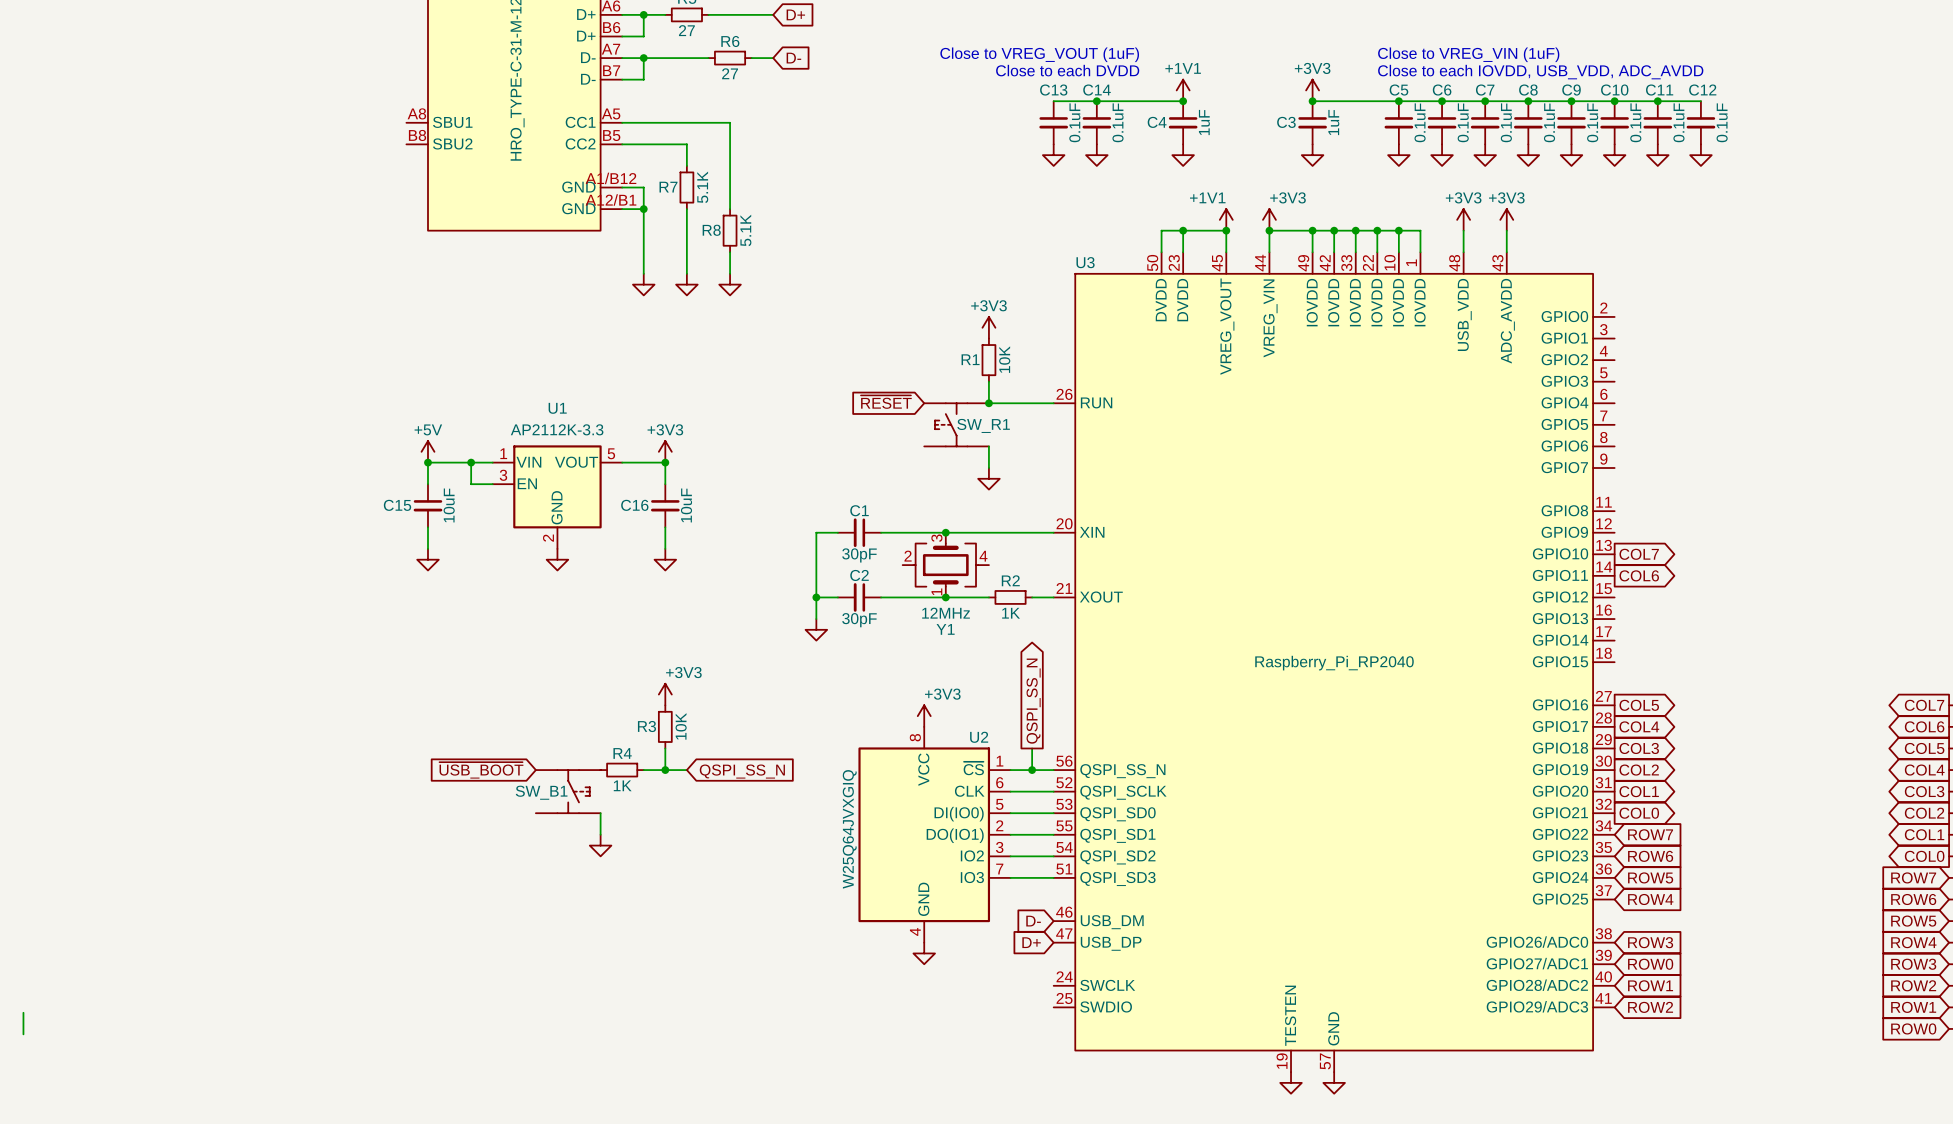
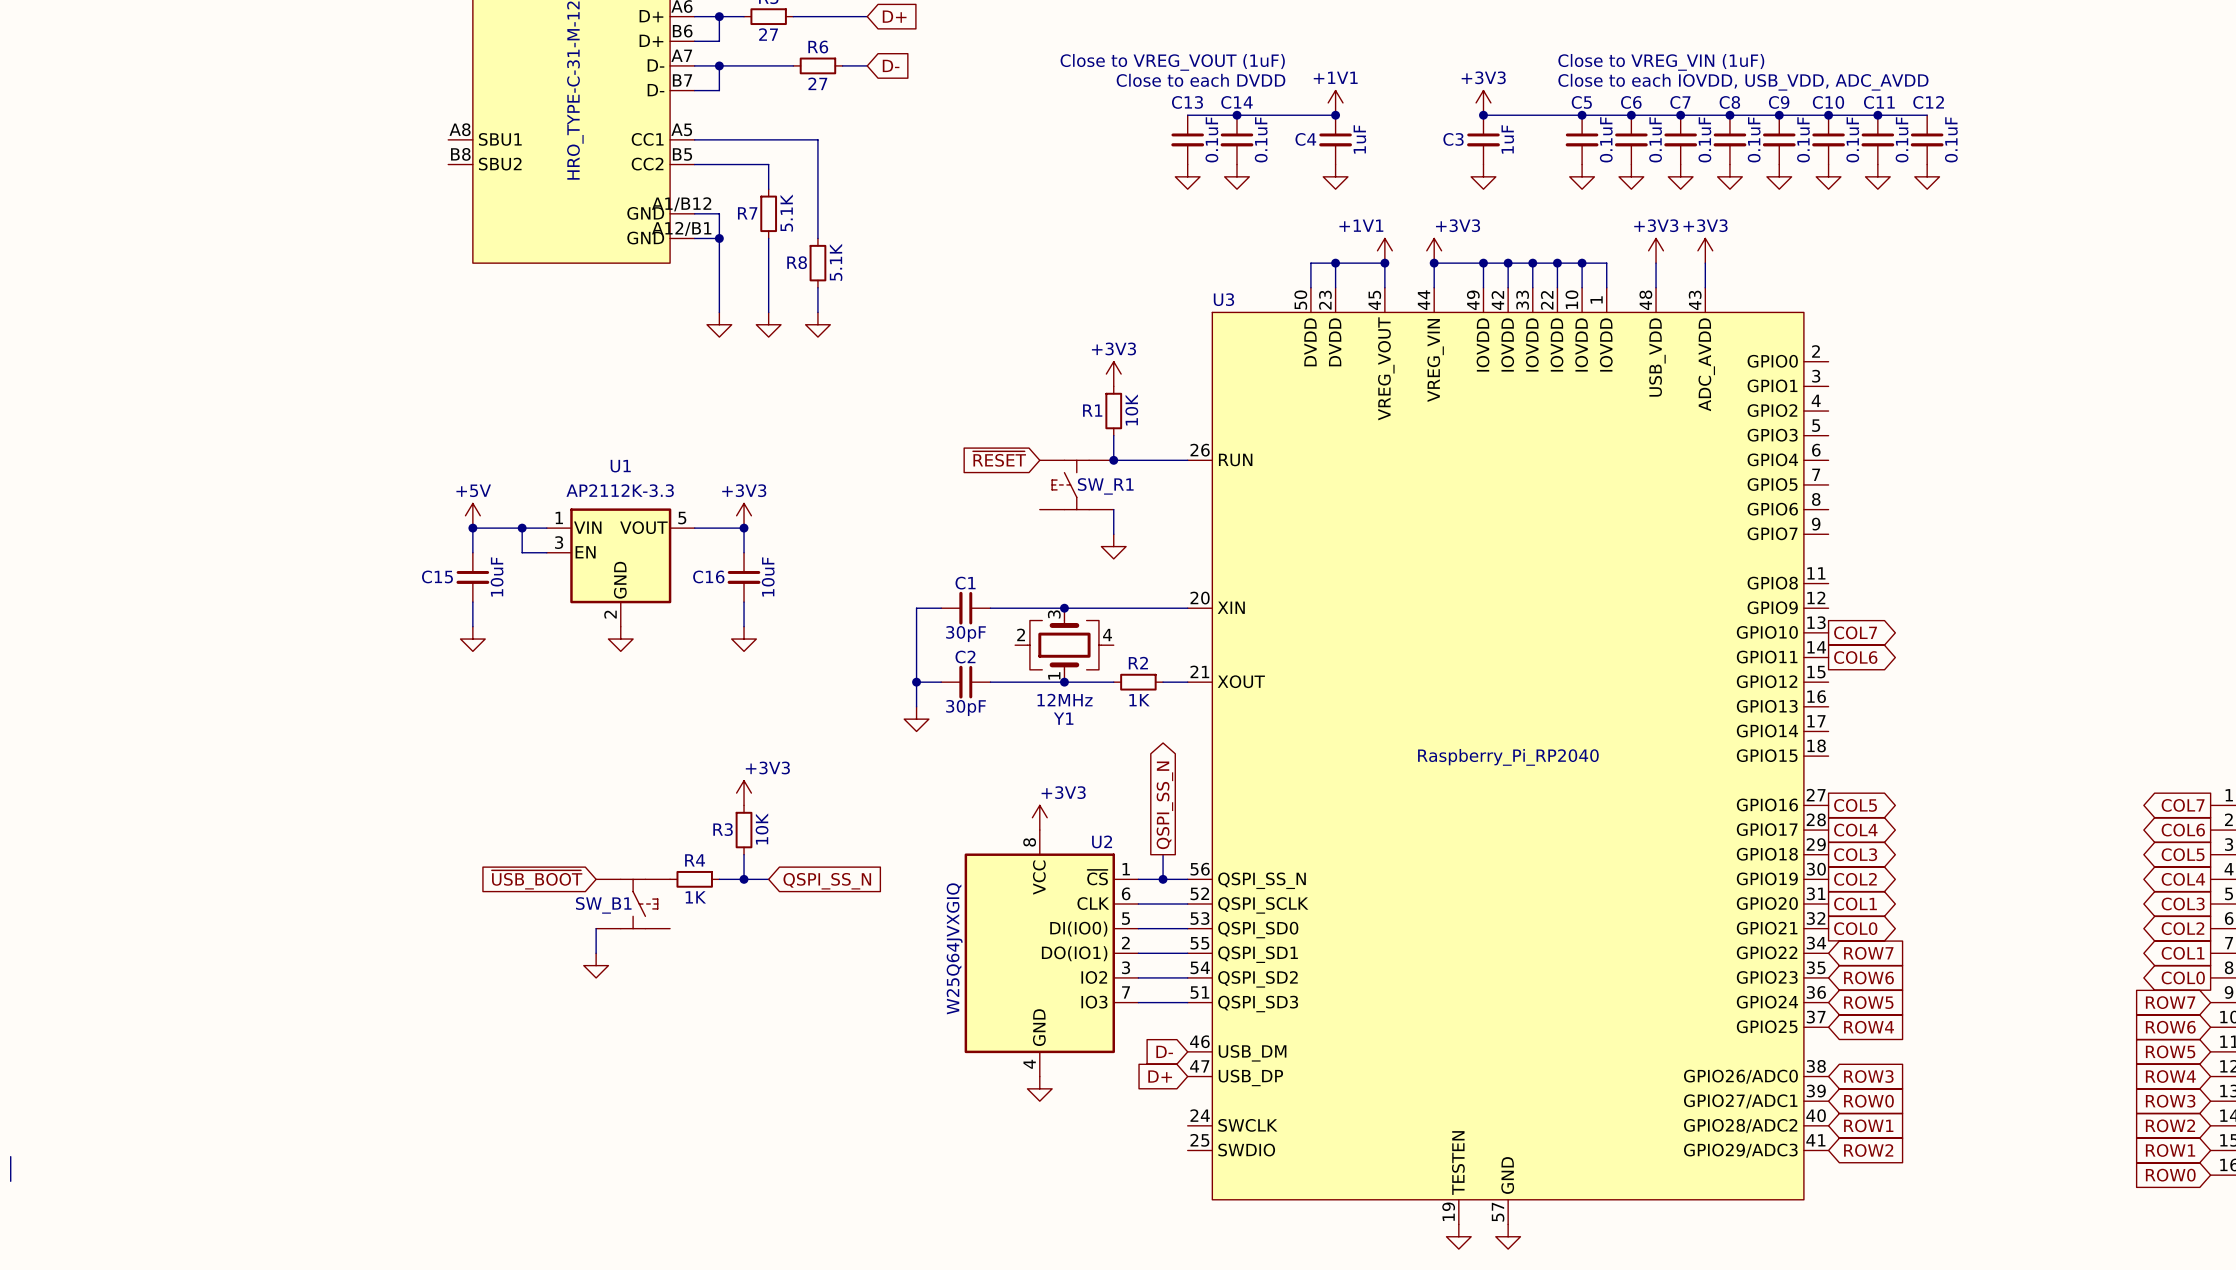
wire: (600, 813) (600, 834) -> (596, 928) (596, 953)
power symbol position: (600, 845) -> (596, 965)

